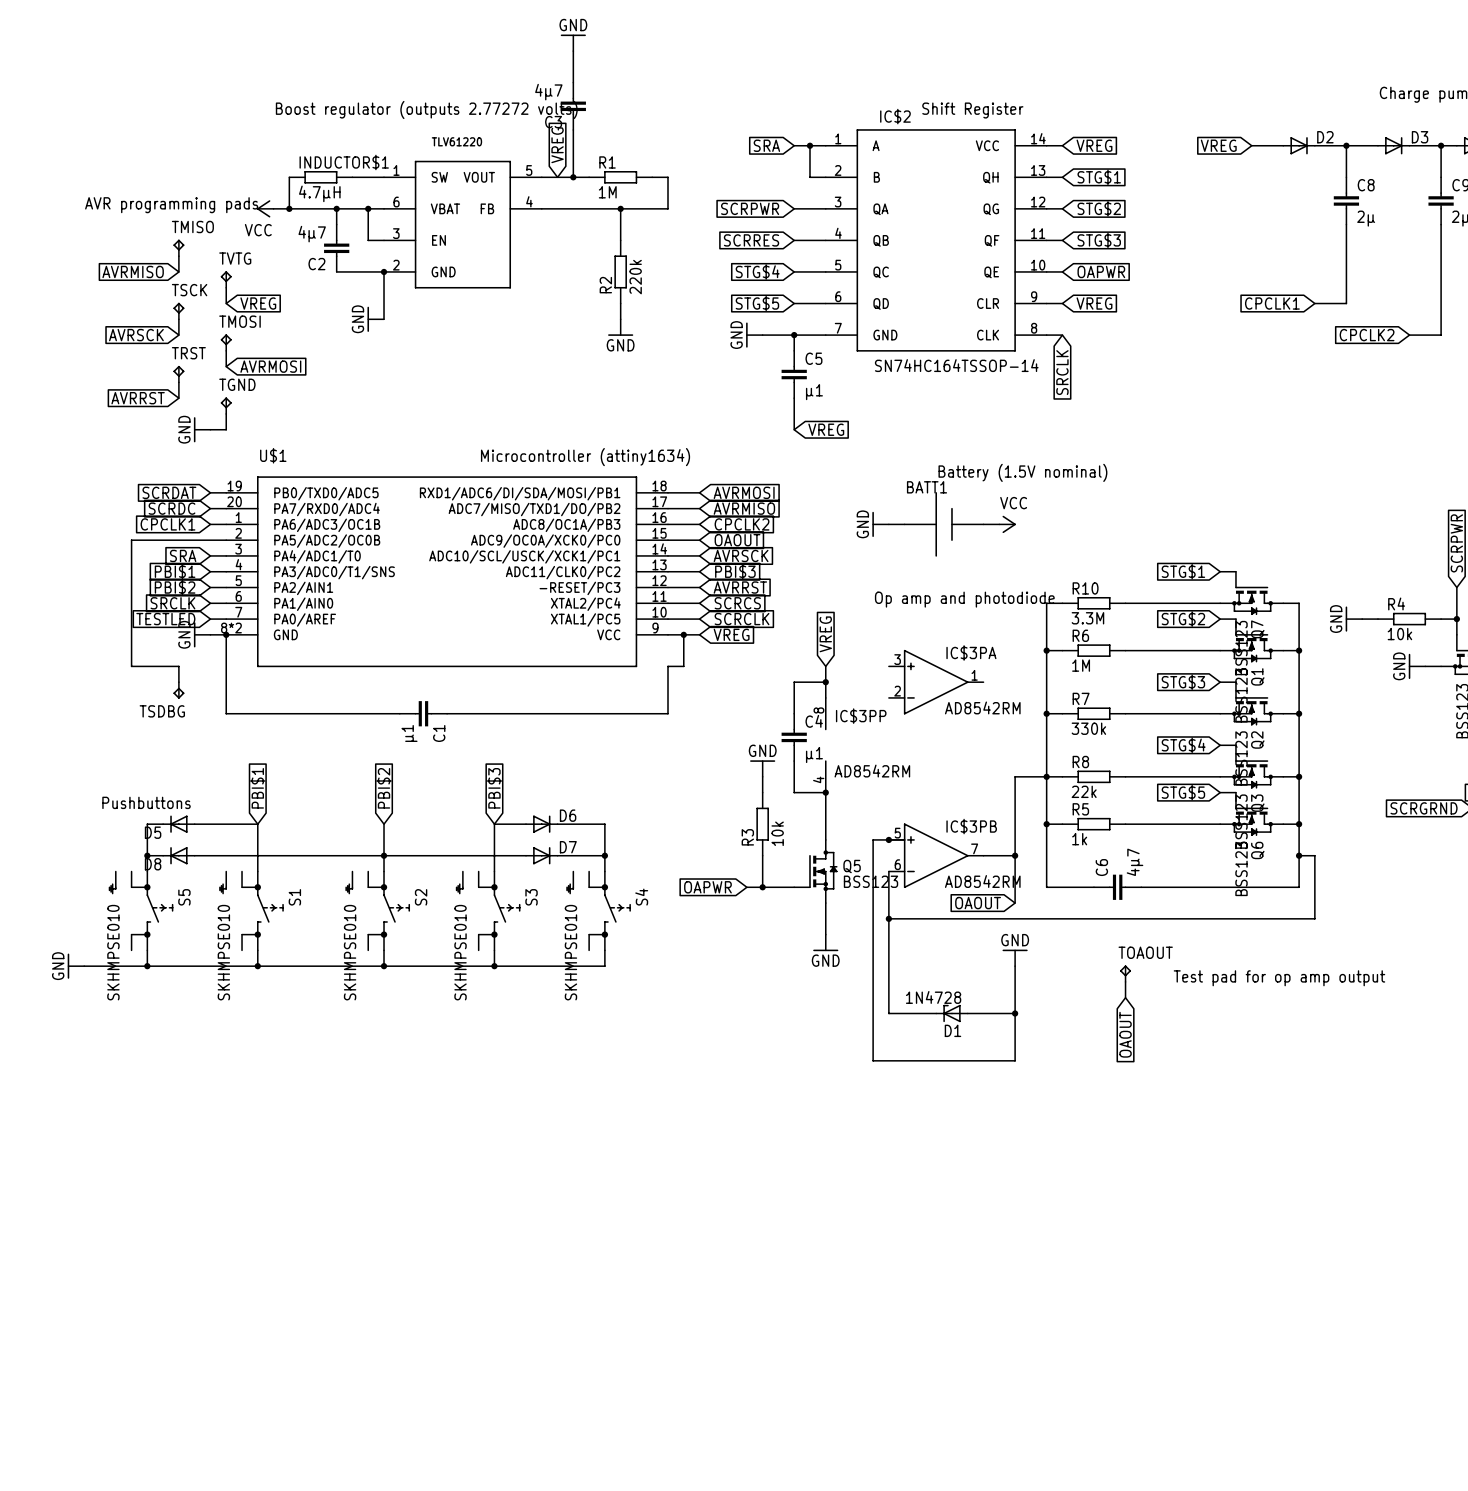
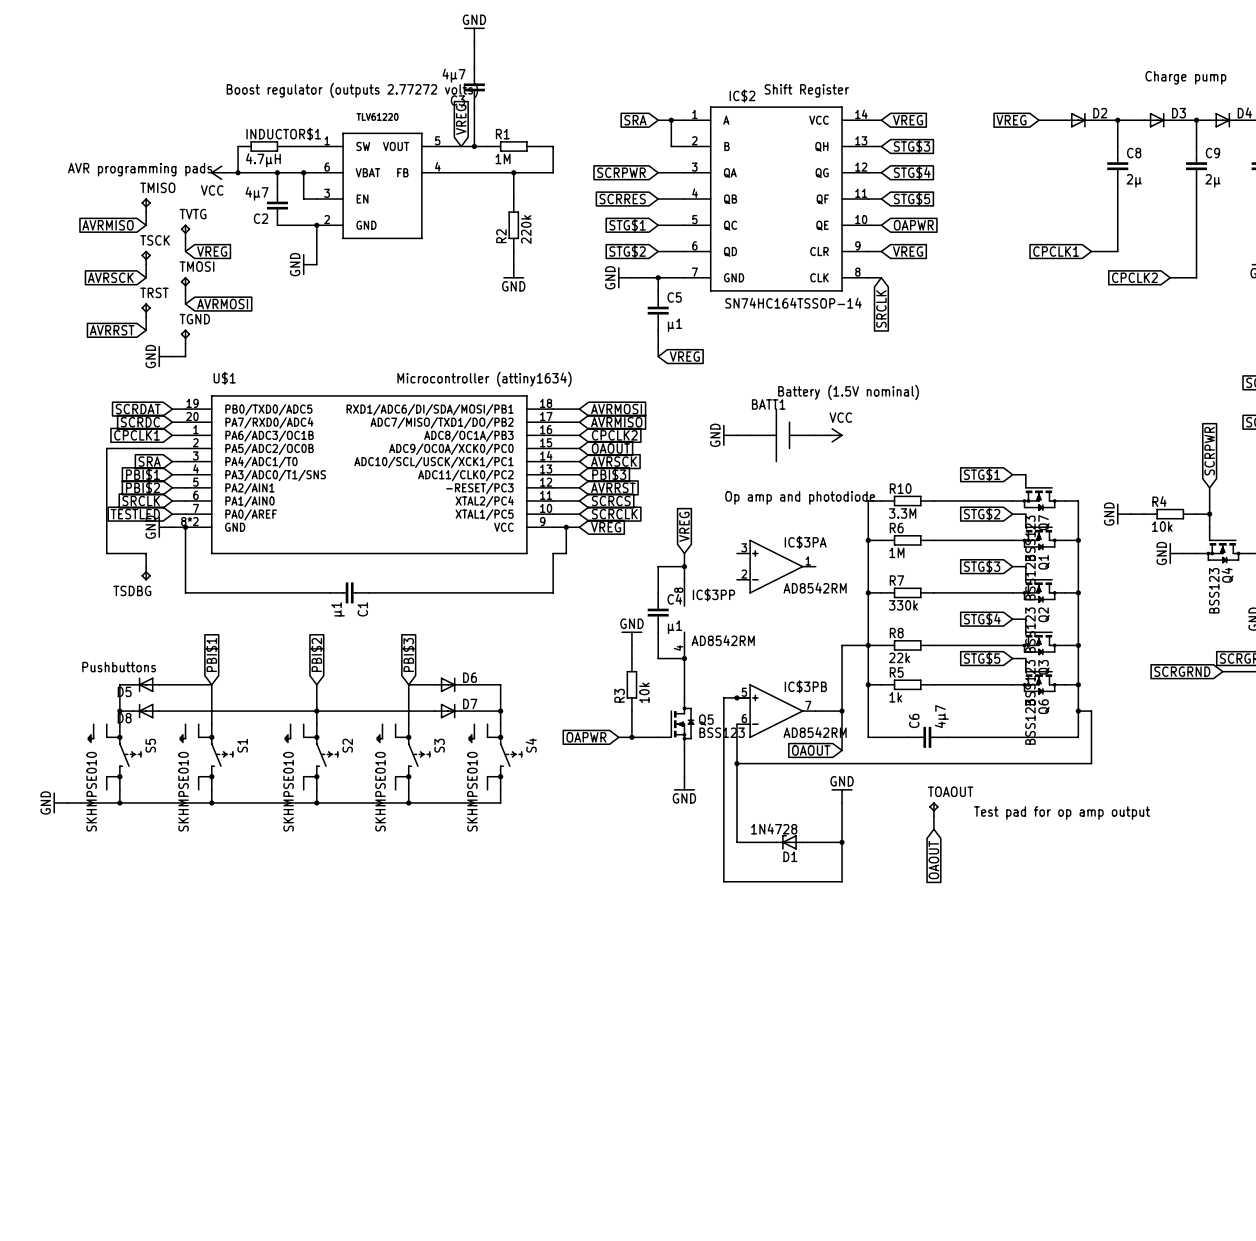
global label: STG$1 (1099, 177) -> STG$3 (912, 146)
global label: STG$2 (1099, 208) -> STG$4 (912, 172)
global label: STG$3 (1099, 240) -> STG$5 (912, 199)
global label: STG$4 (757, 271) -> STG$1 (627, 225)
global label: STG$5 (757, 303) -> STG$2 (627, 251)

